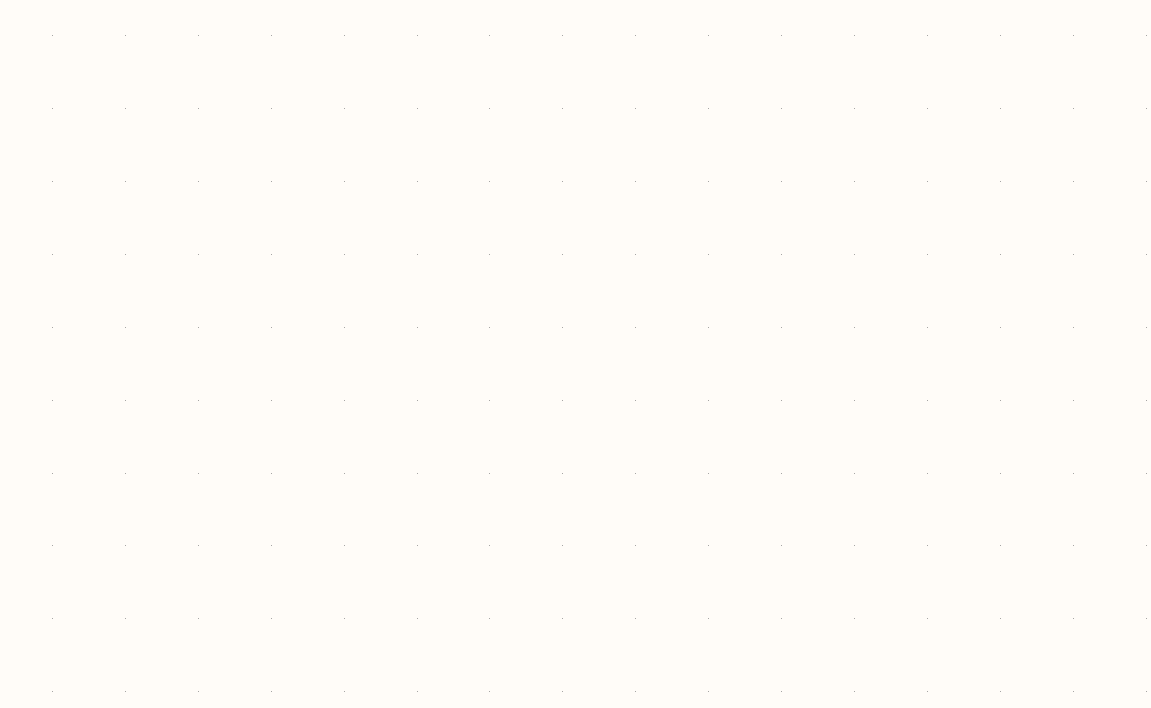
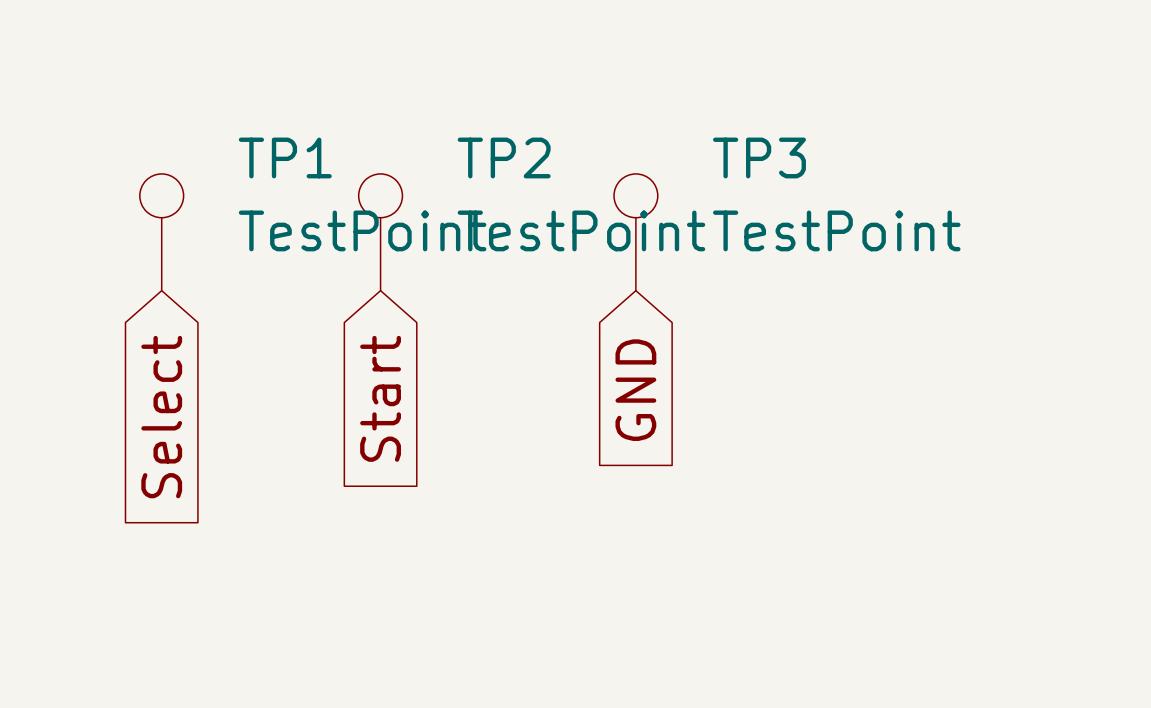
TP1: none -> TestPoint (161, 232)
TP2: none -> TestPoint (380, 232)
TP3: none -> TestPoint (635, 232)
global label: none -> GND (635, 390)
global label: none -> Start (380, 398)
global label: none -> Select (161, 417)

